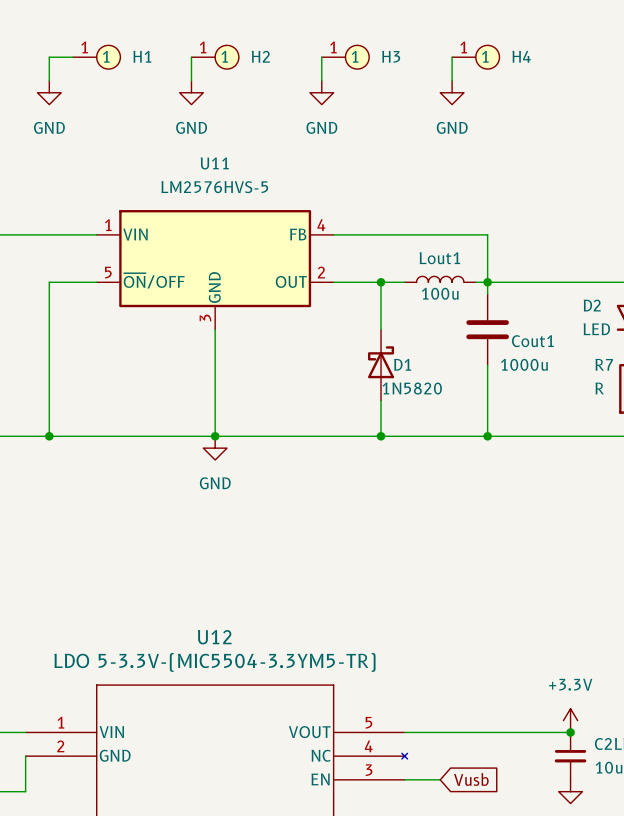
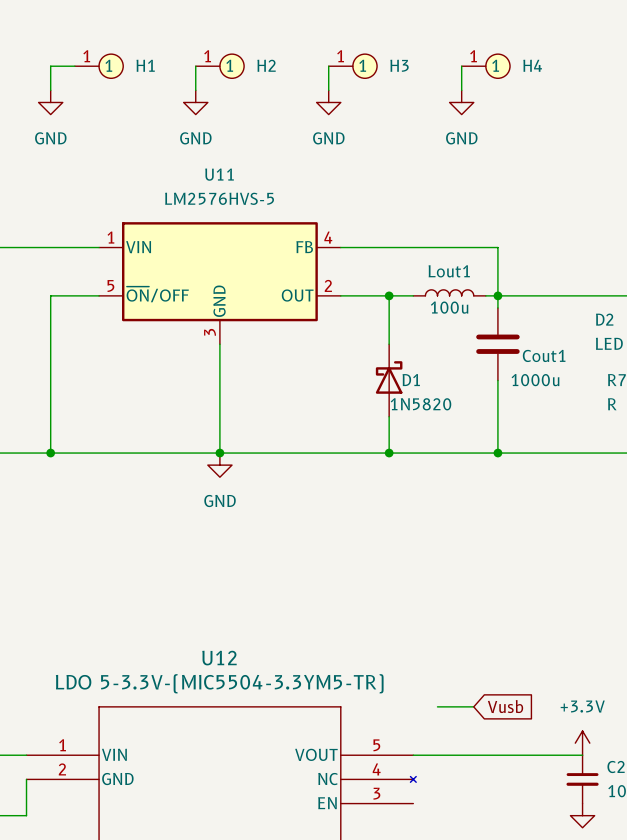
junction: (570, 732) -> none
wire: (404, 779) (440, 779) -> (437, 706) (473, 706)
global label position: Vusb (471, 779) -> Vusb (505, 706)

